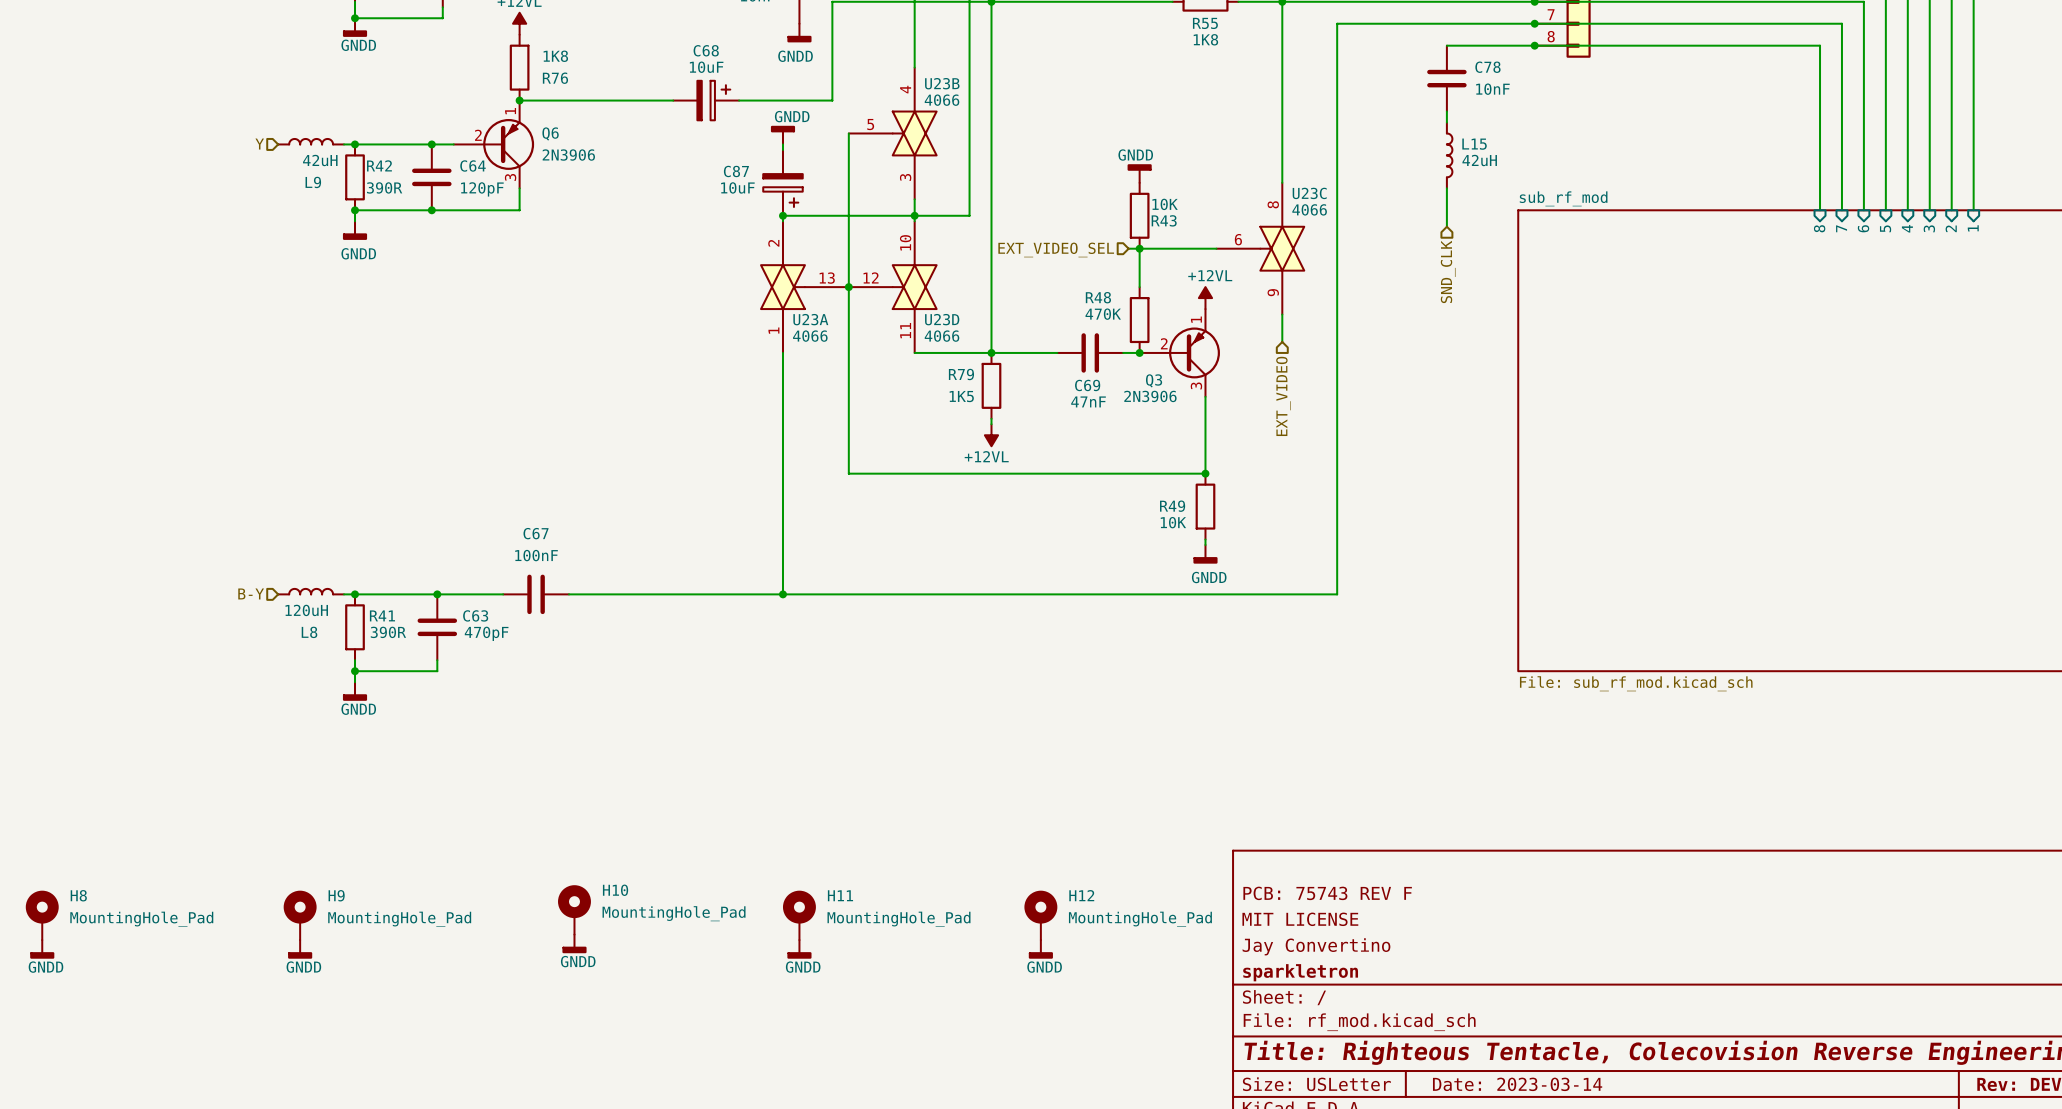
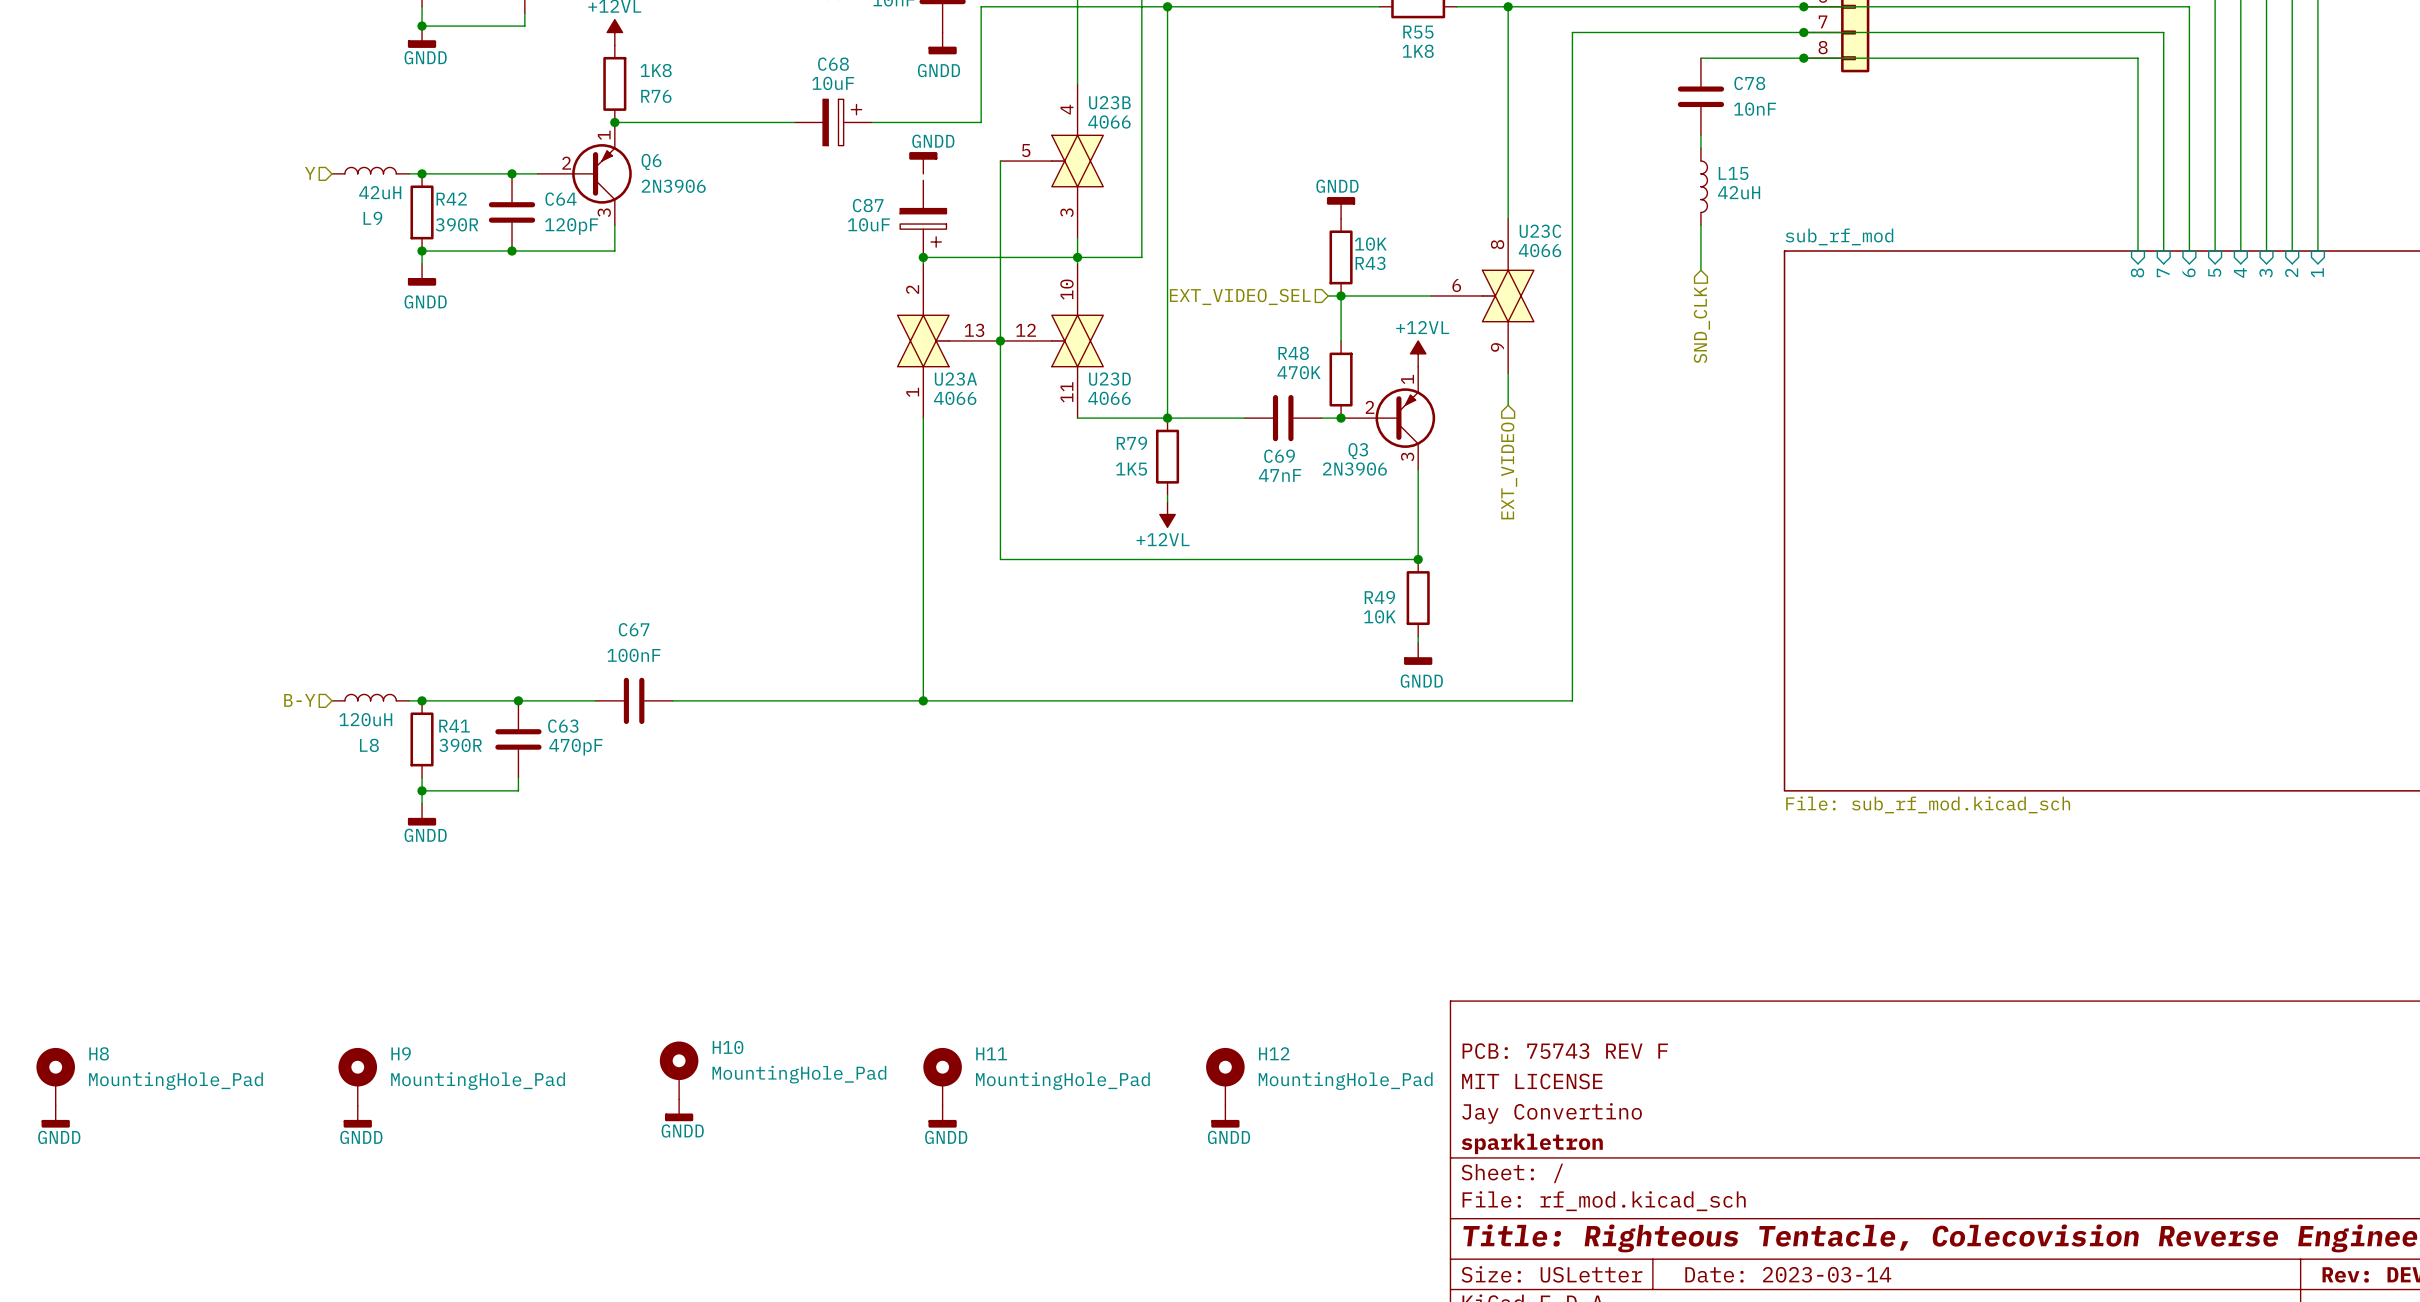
wire: (782, 144) (782, 149) -> none

